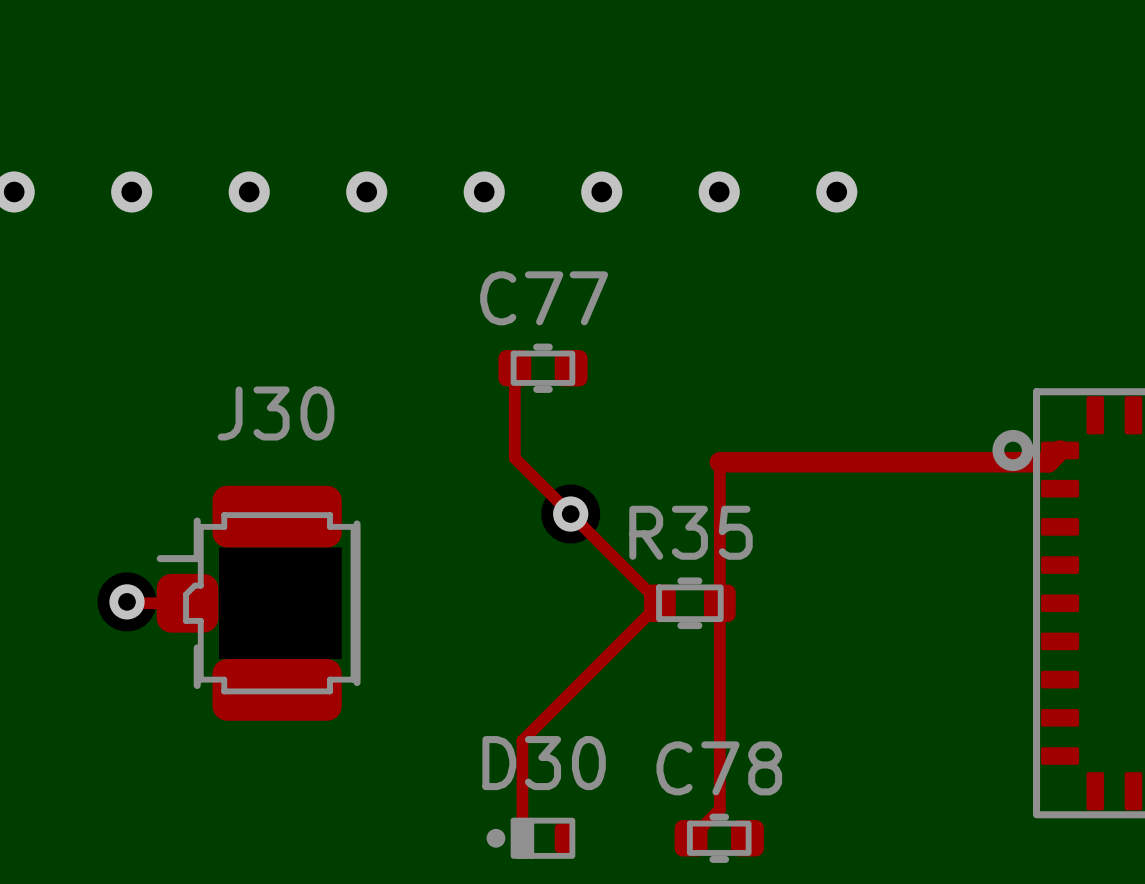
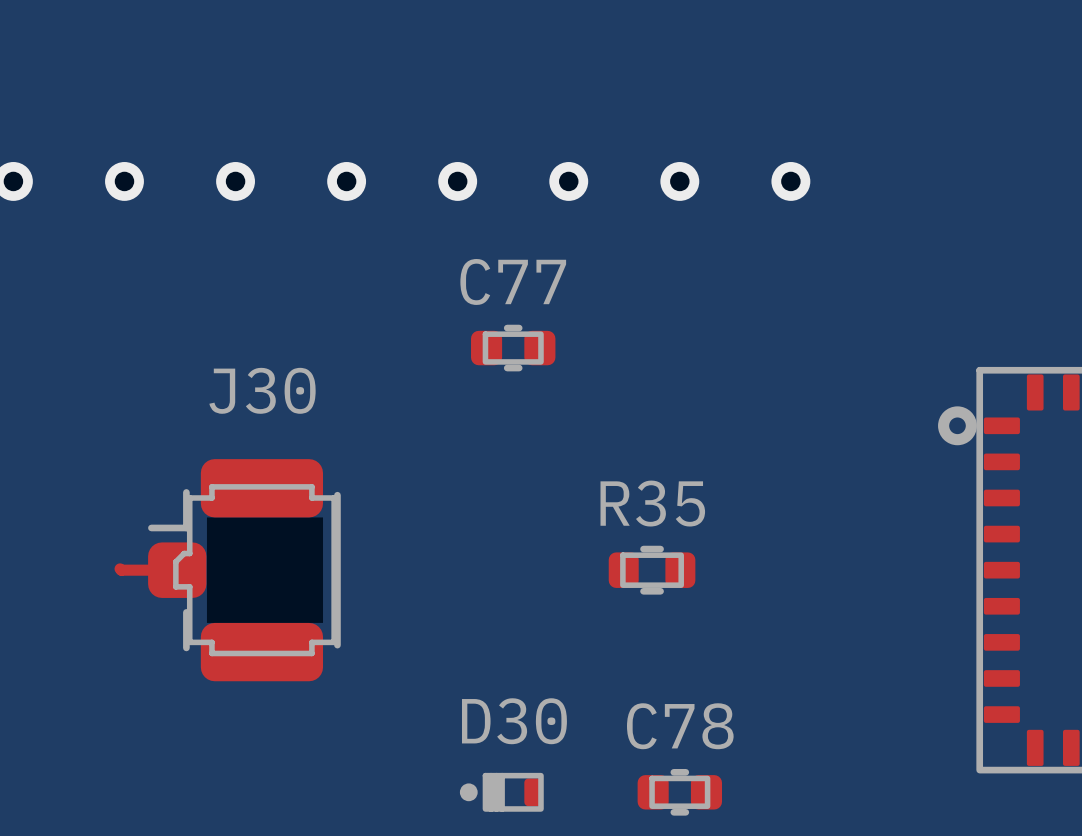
top track: (514, 368) (514, 458) (659, 603) (522, 740) (522, 838) -> none
top track: (1060, 450) (1048, 462) (719, 462) (719, 809) (691, 838) -> none
via: (570, 514) -> none
via: (127, 601) -> none

